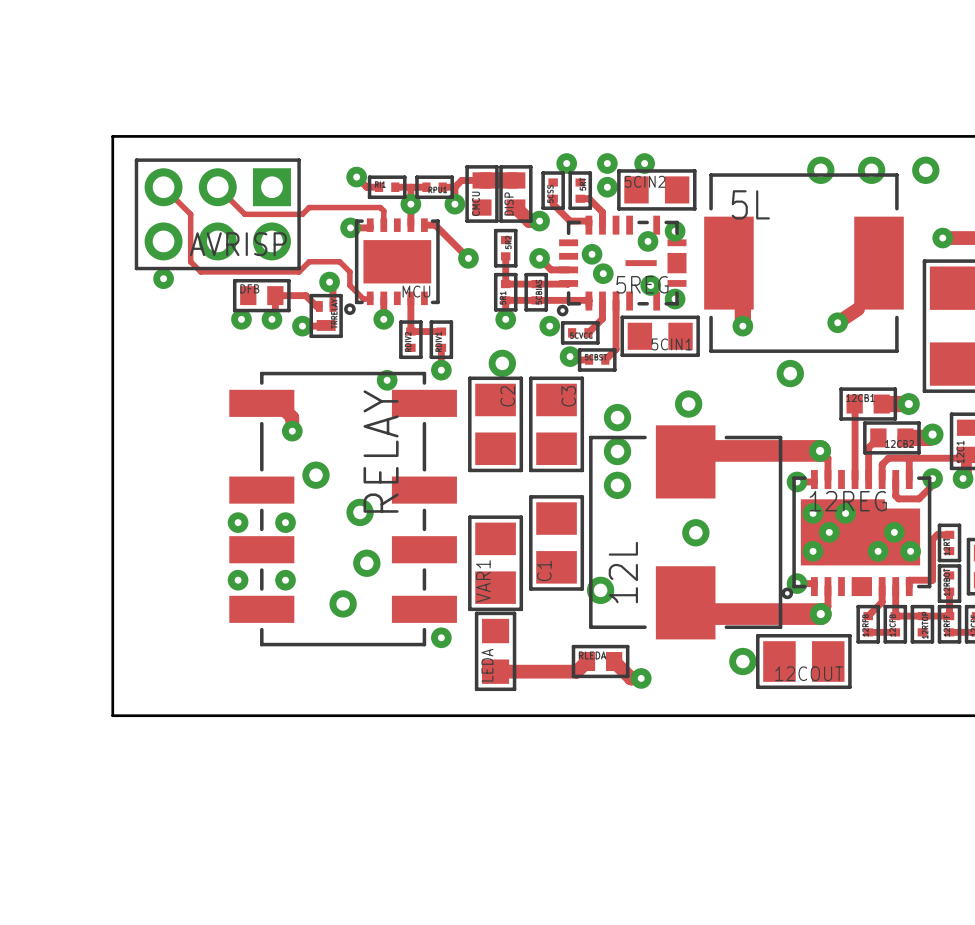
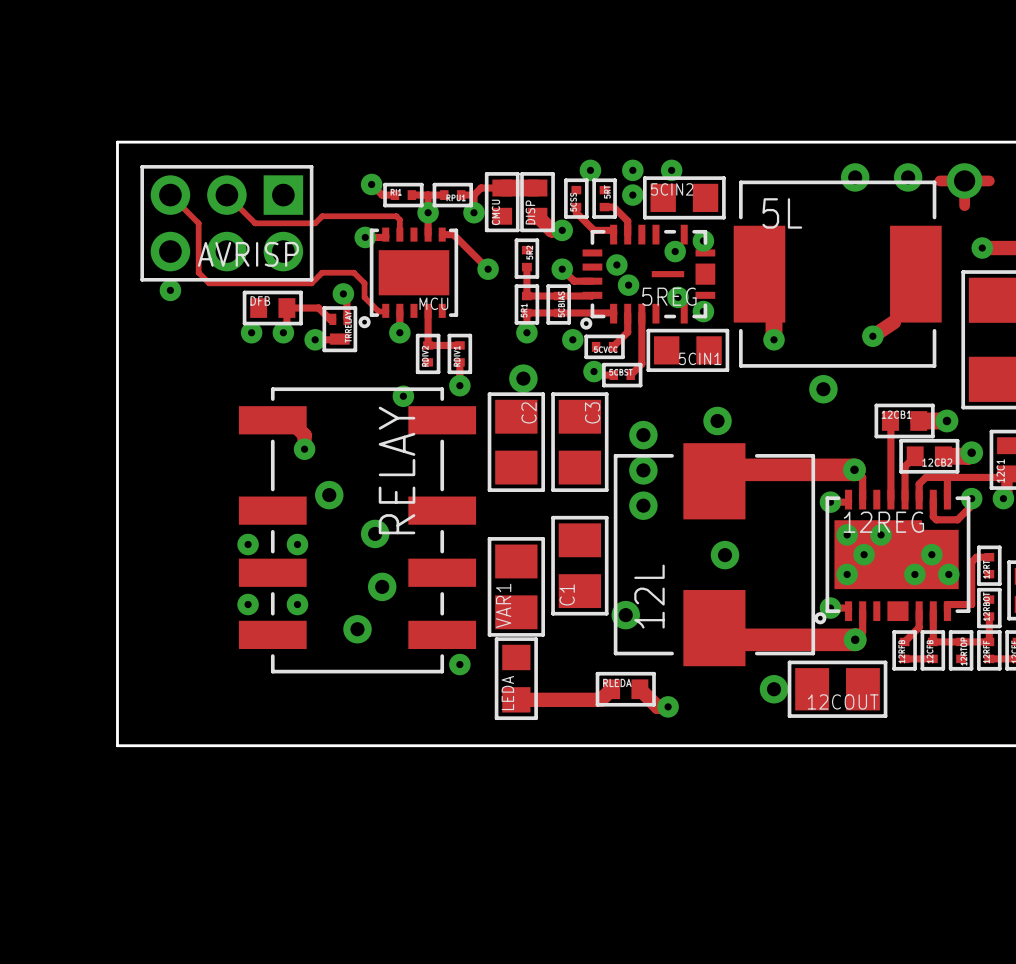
via: (925, 170) -> none
track: none -> (939, 180) (989, 180)
part: none -> (964, 180)
track: none -> (964, 195) (964, 205)

